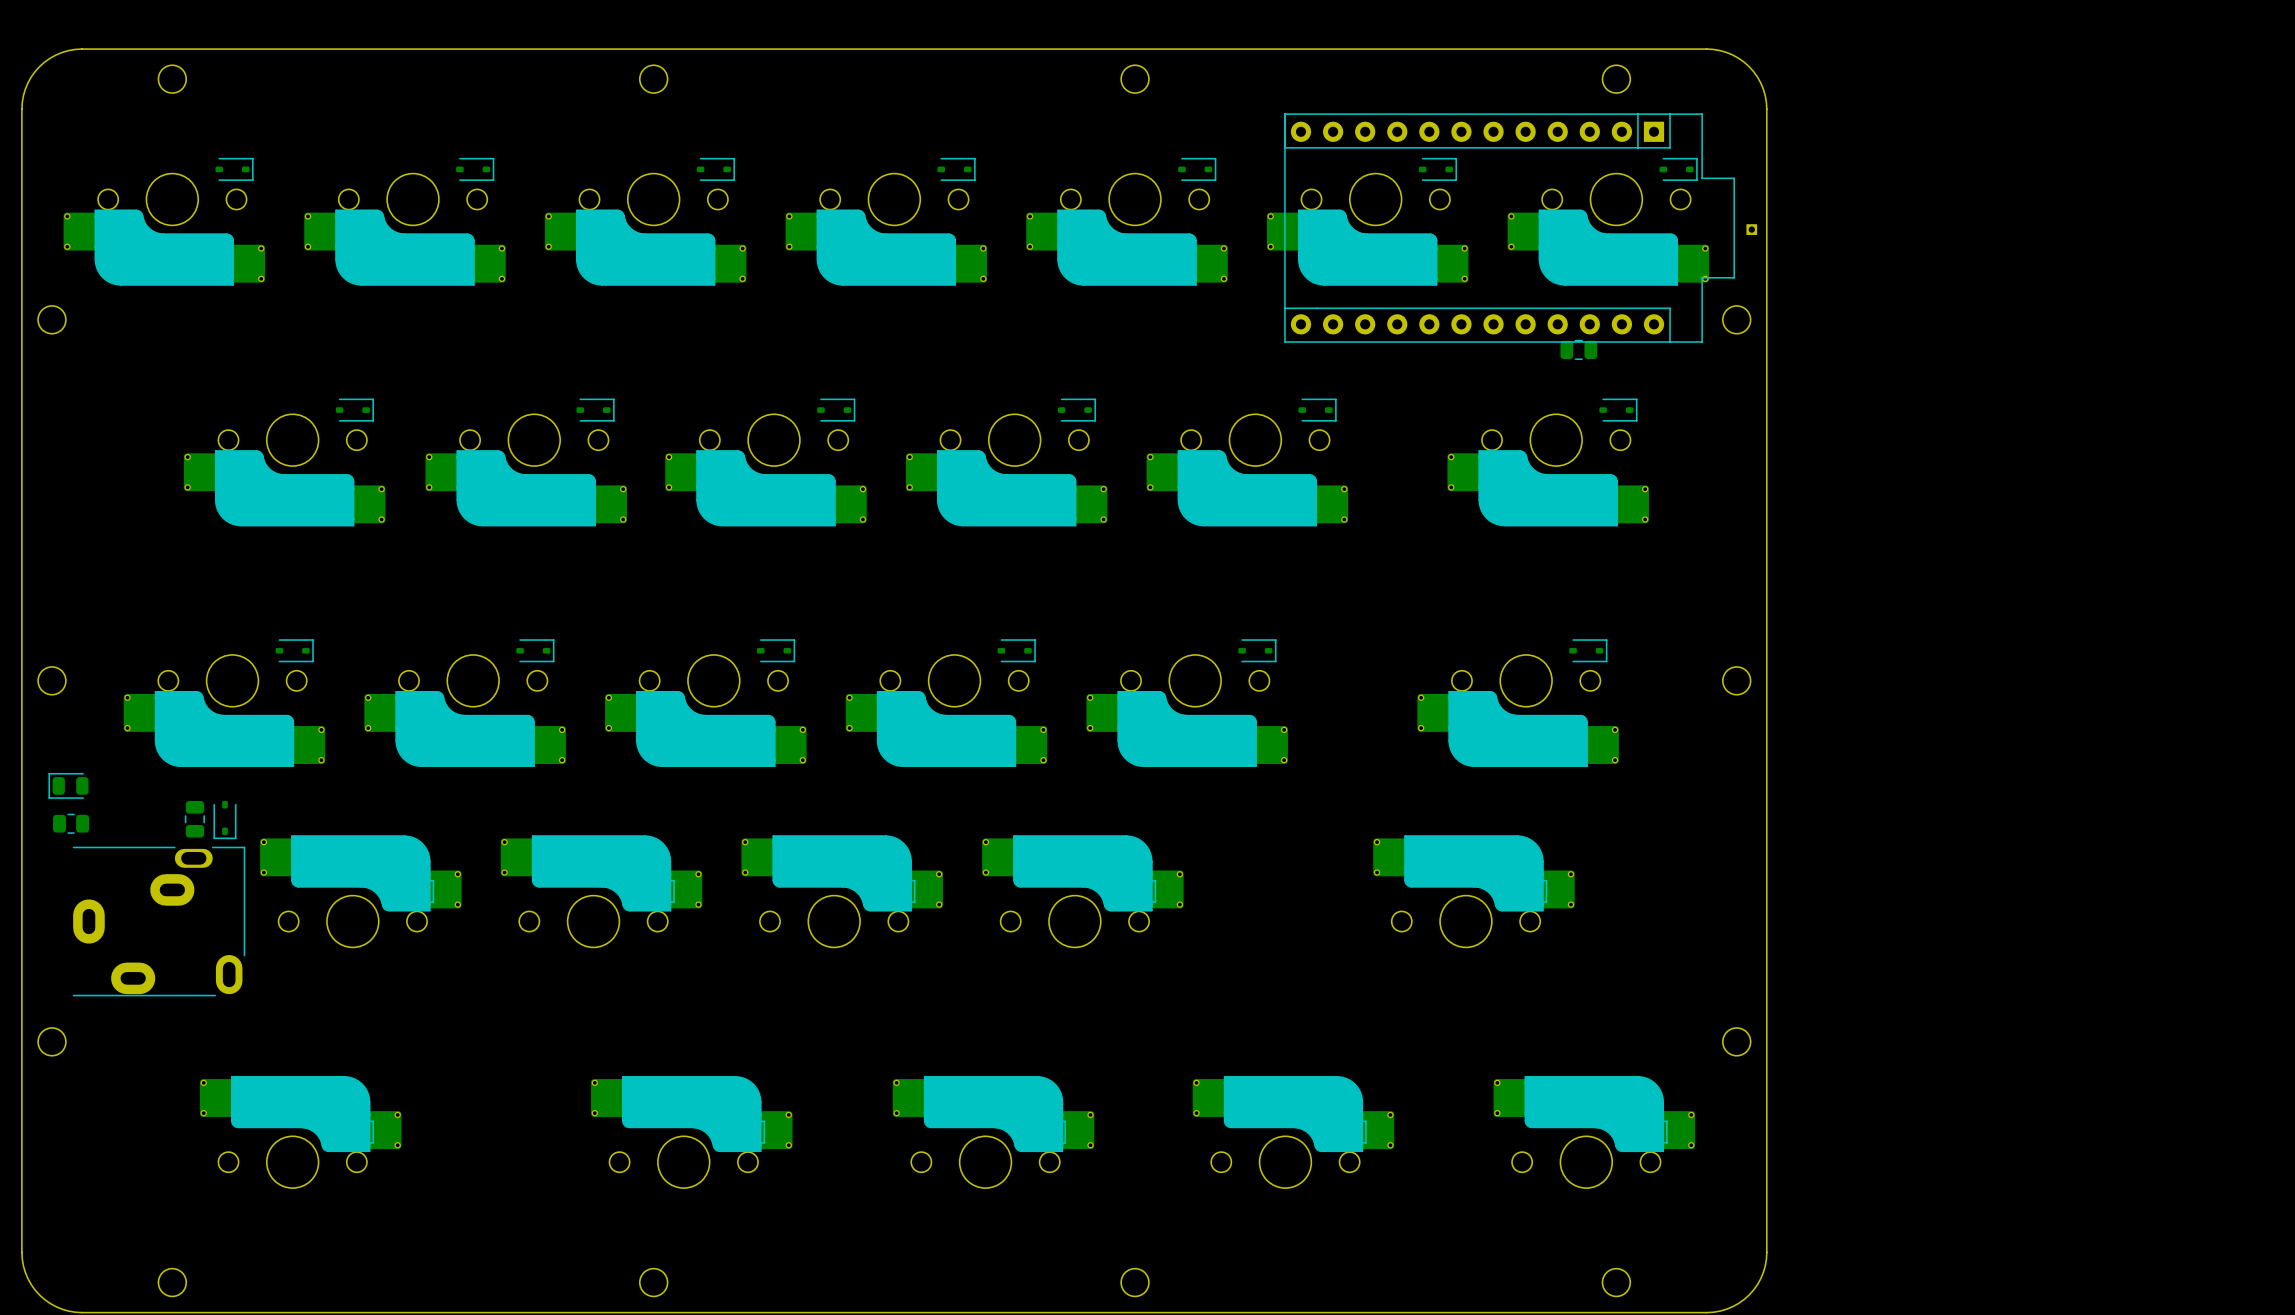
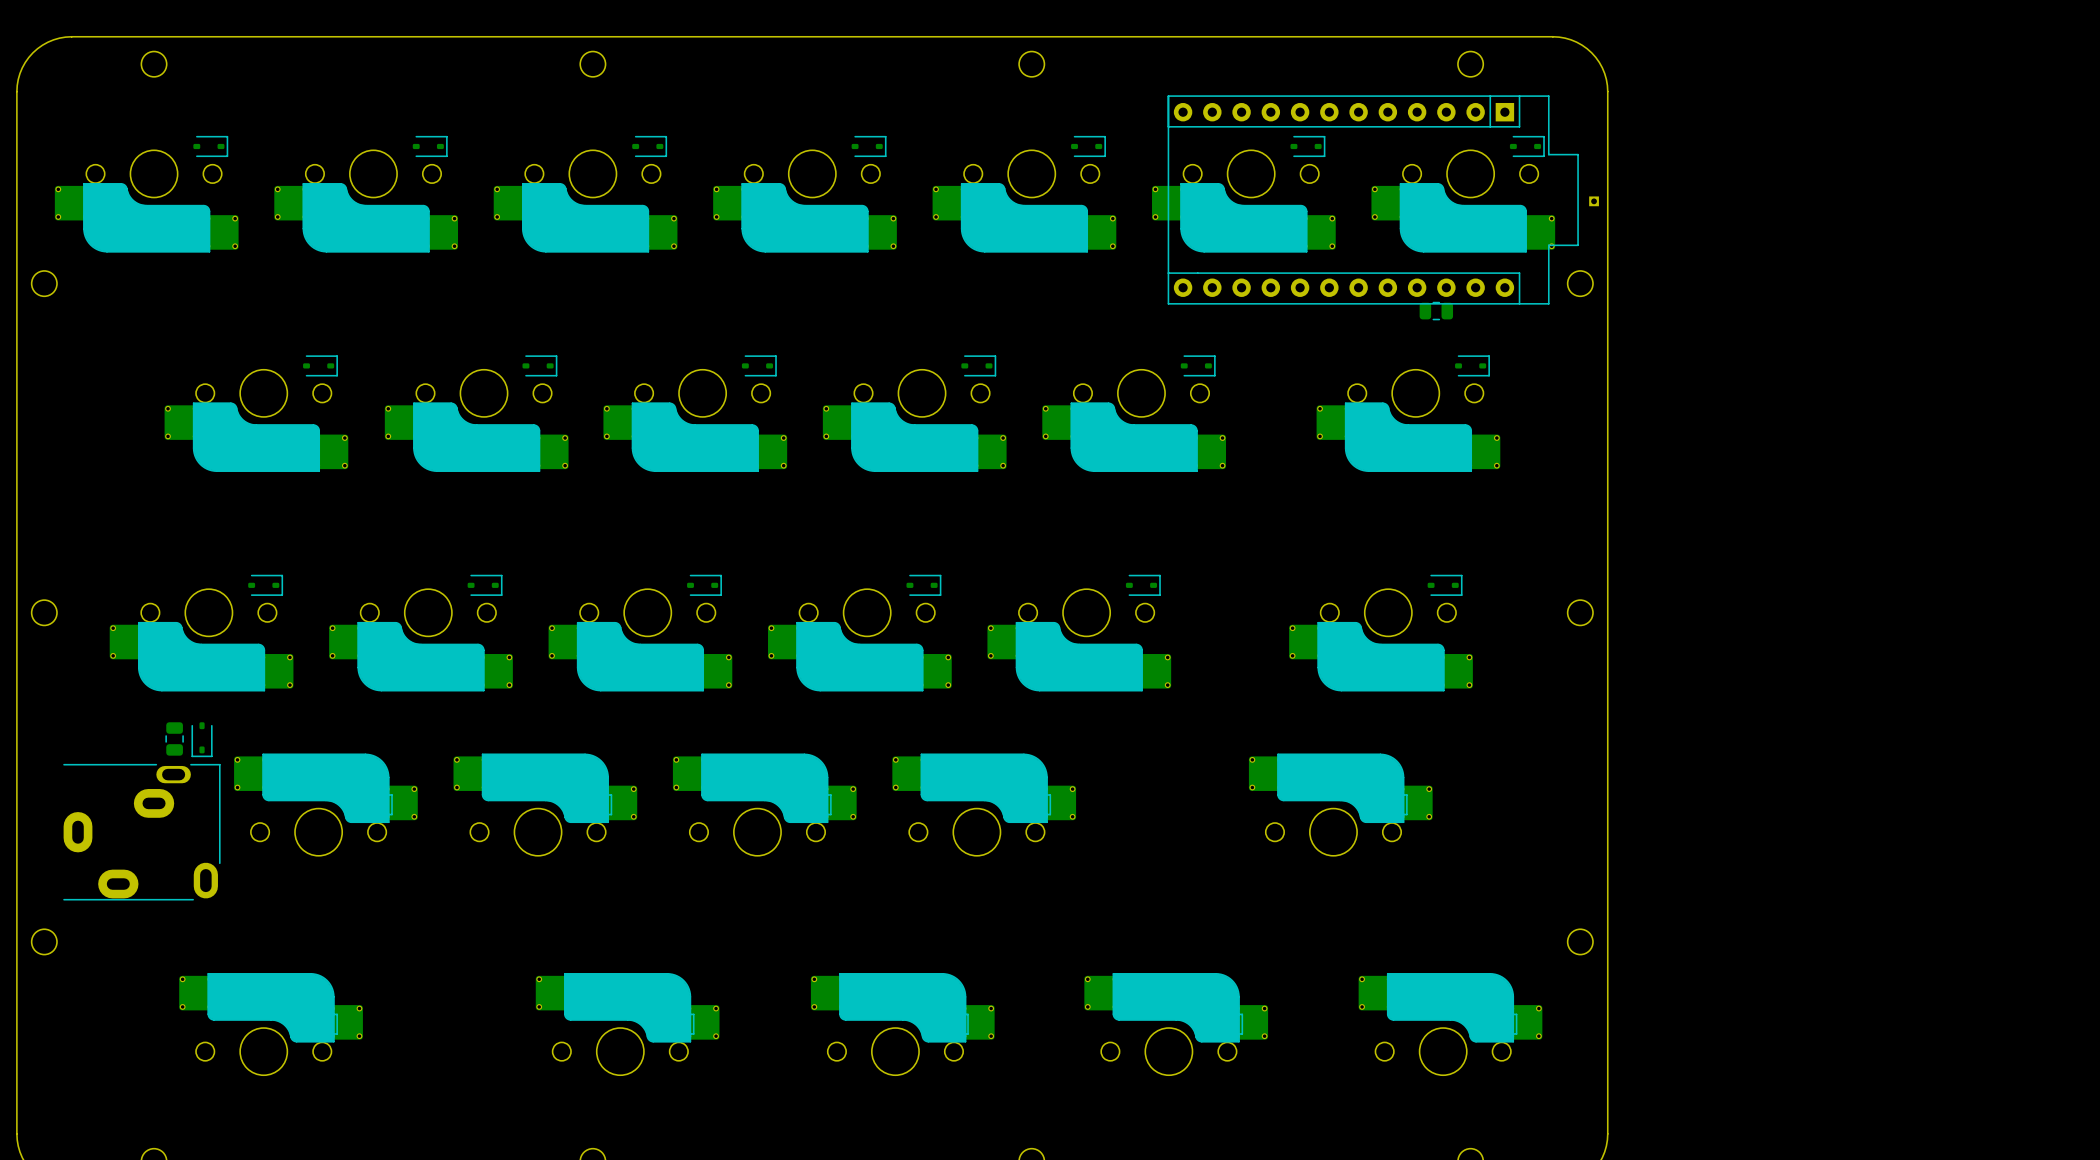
part: (68, 785) -> none
part: (71, 823) -> none

